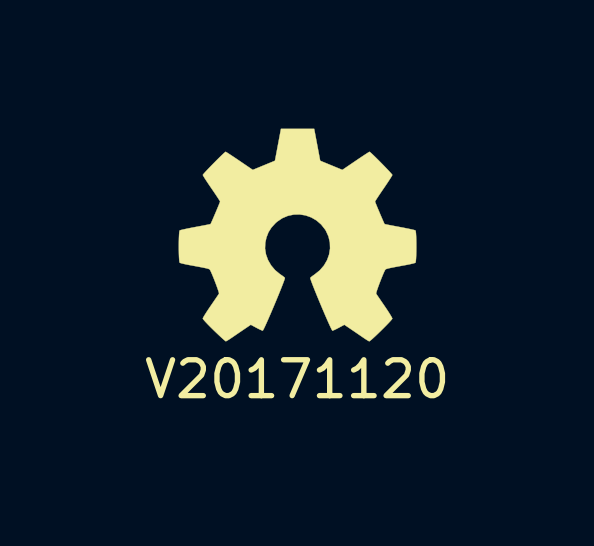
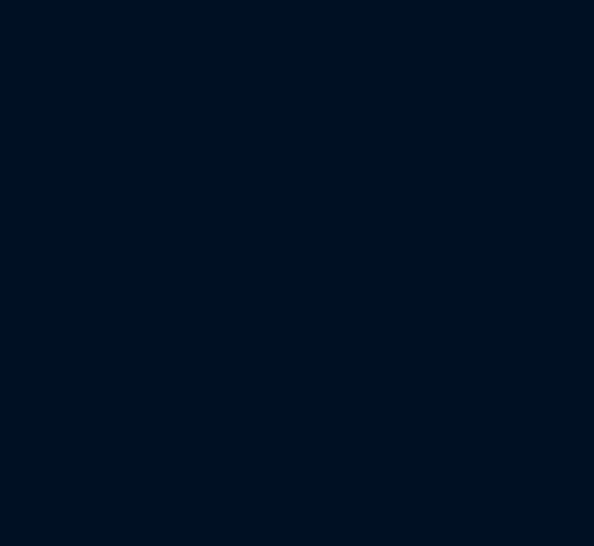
drawing: [178, 128, 417, 342] -> none

